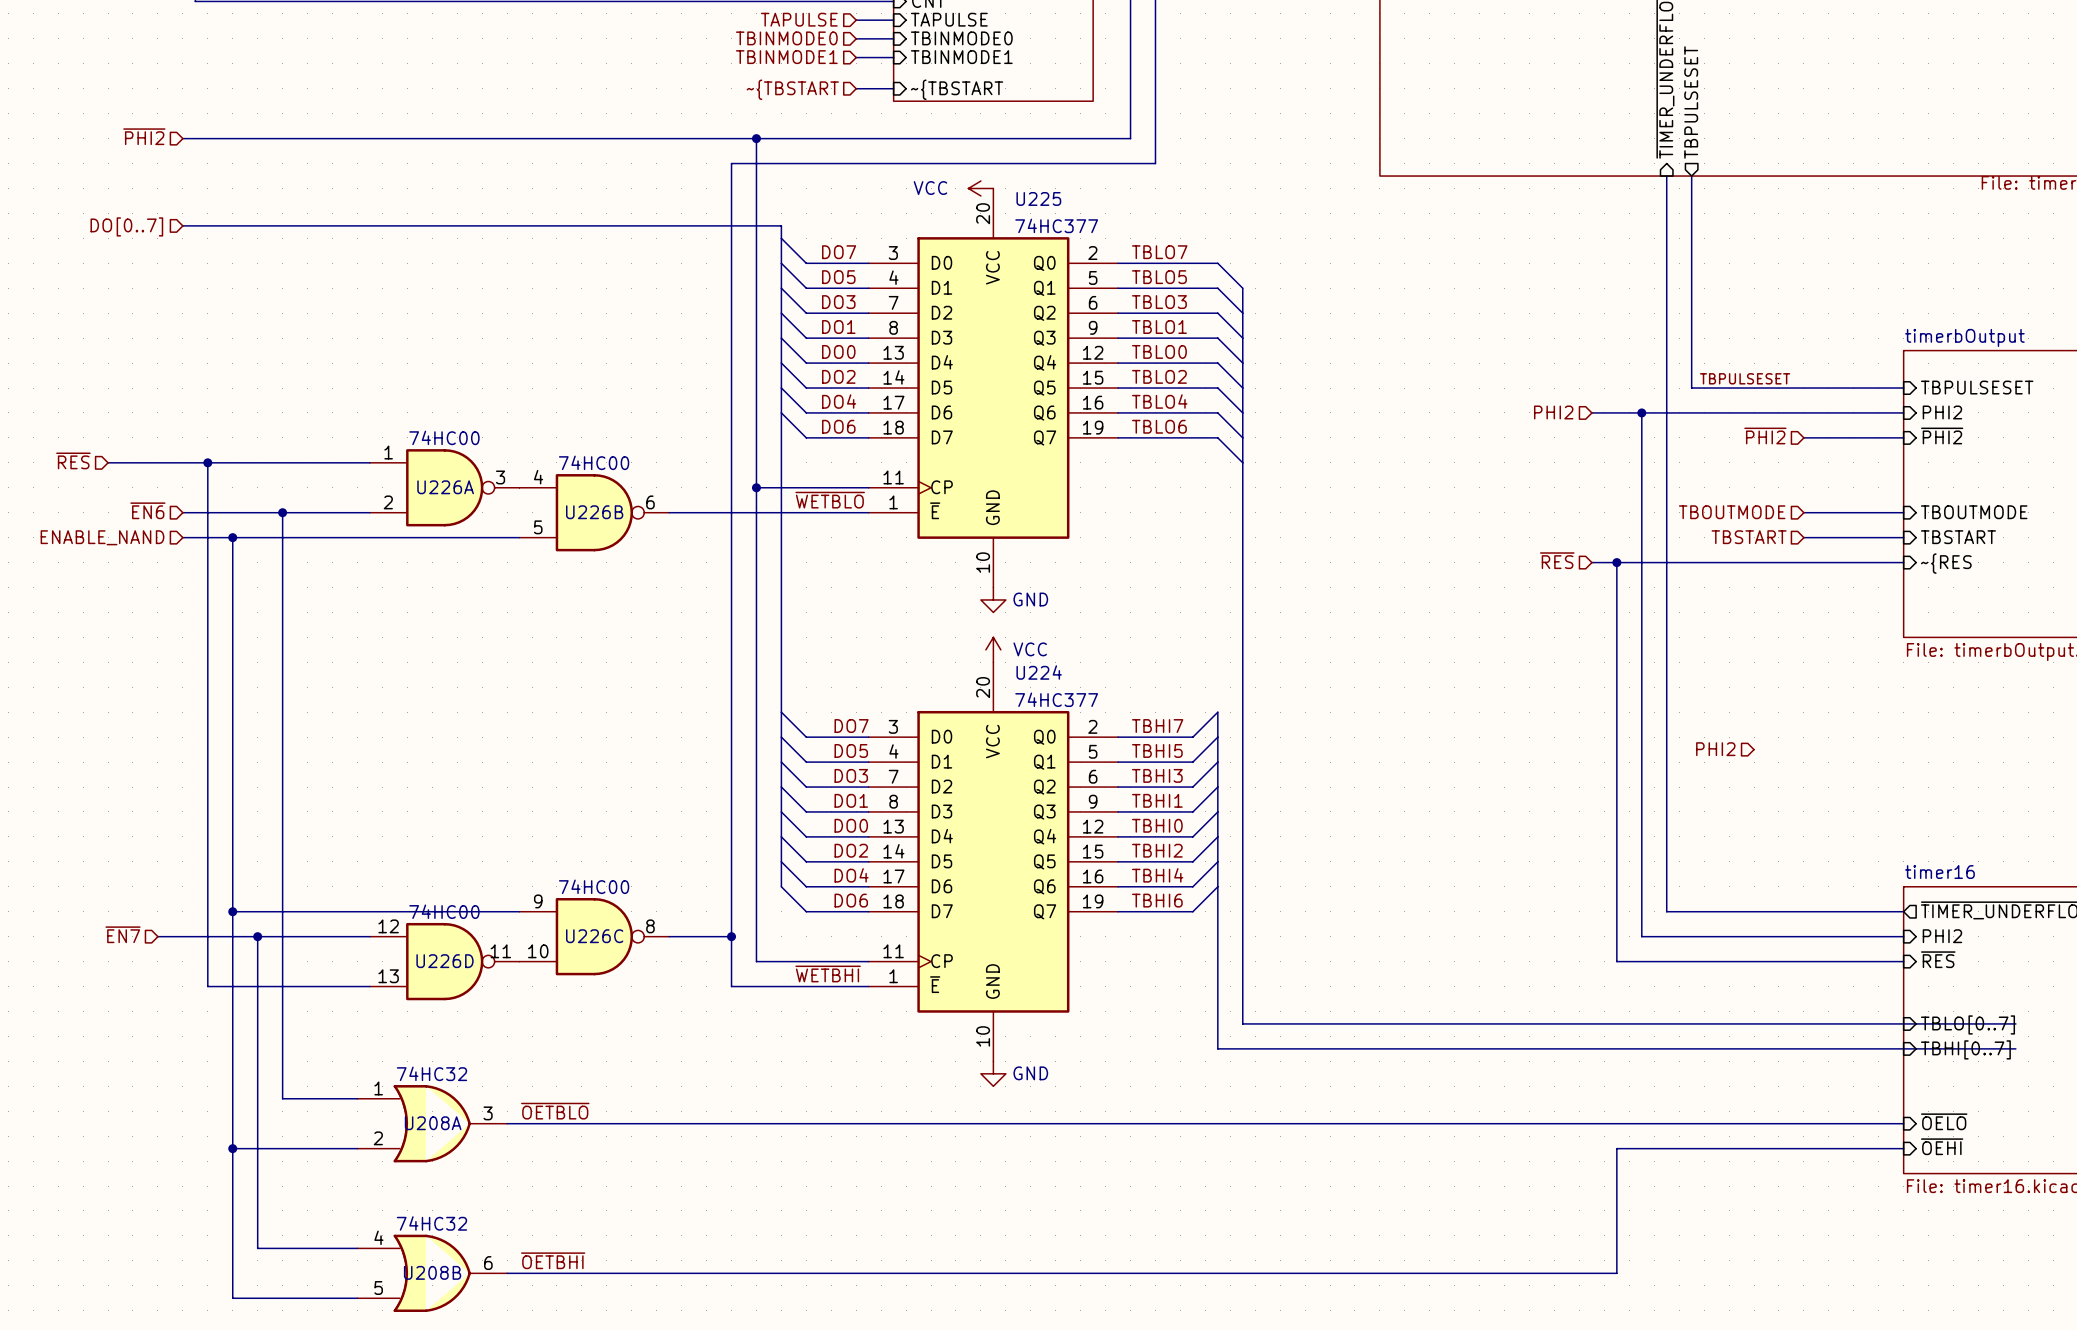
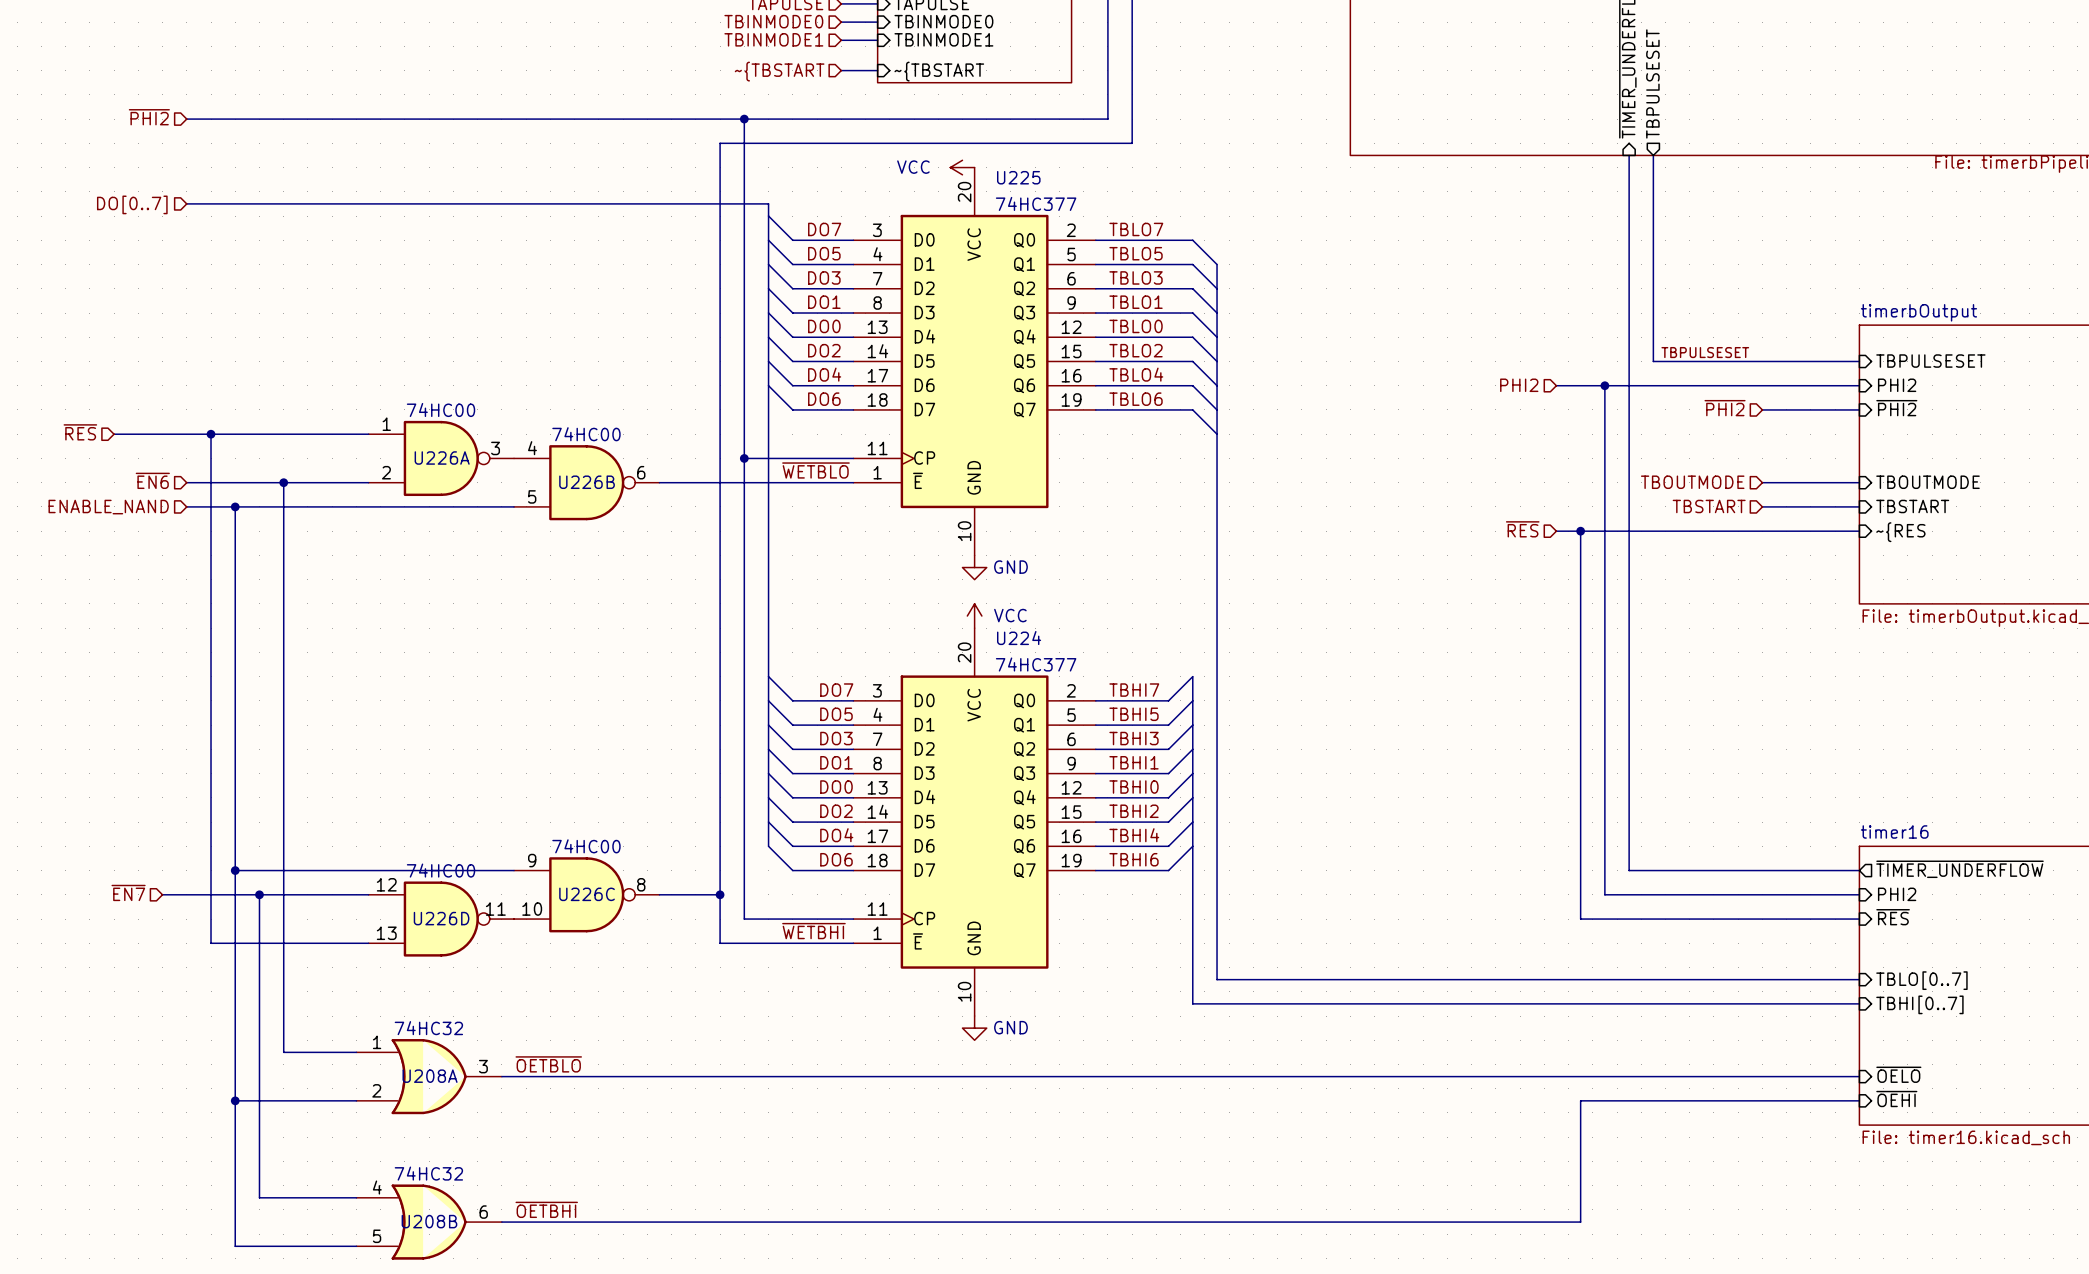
hierarchical label: PHI2 (1715, 749) -> none
bus: (1903, 1023) (2015, 1023) -> none
bus: (1903, 1048) (2015, 1048) -> none

